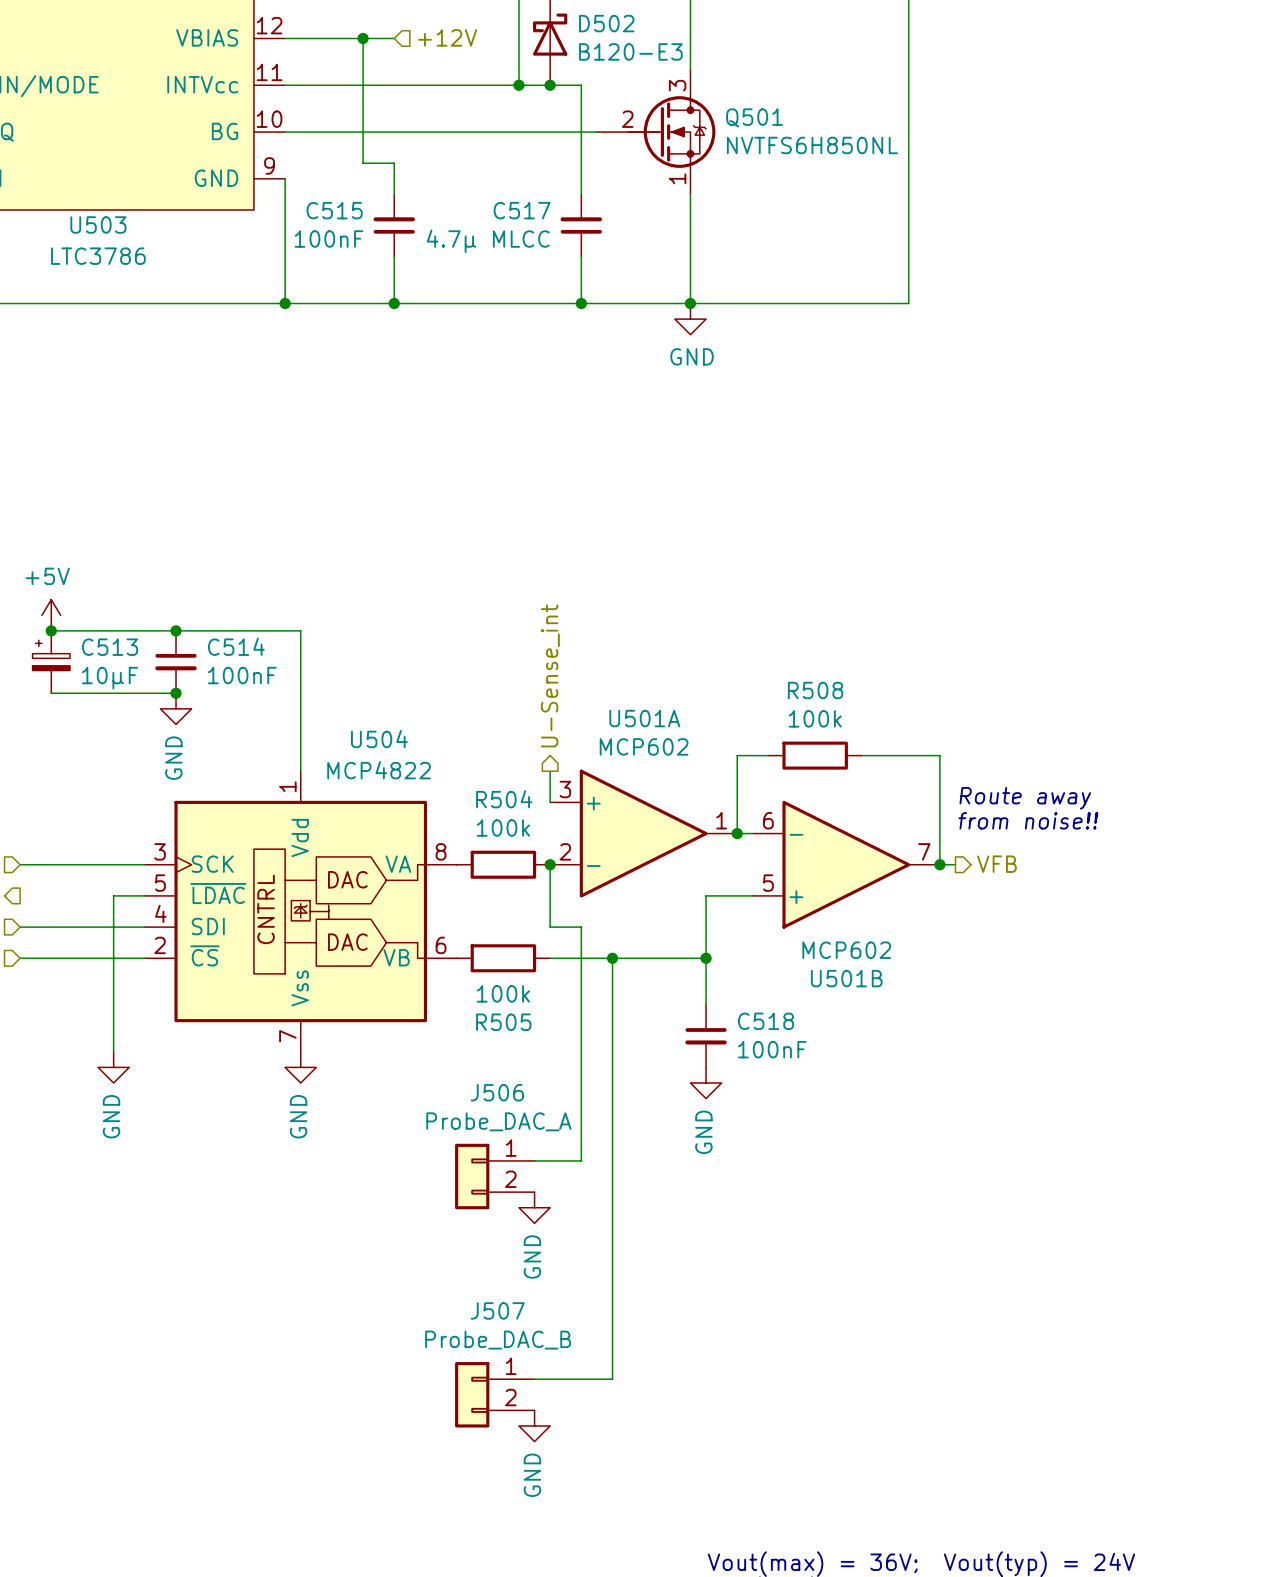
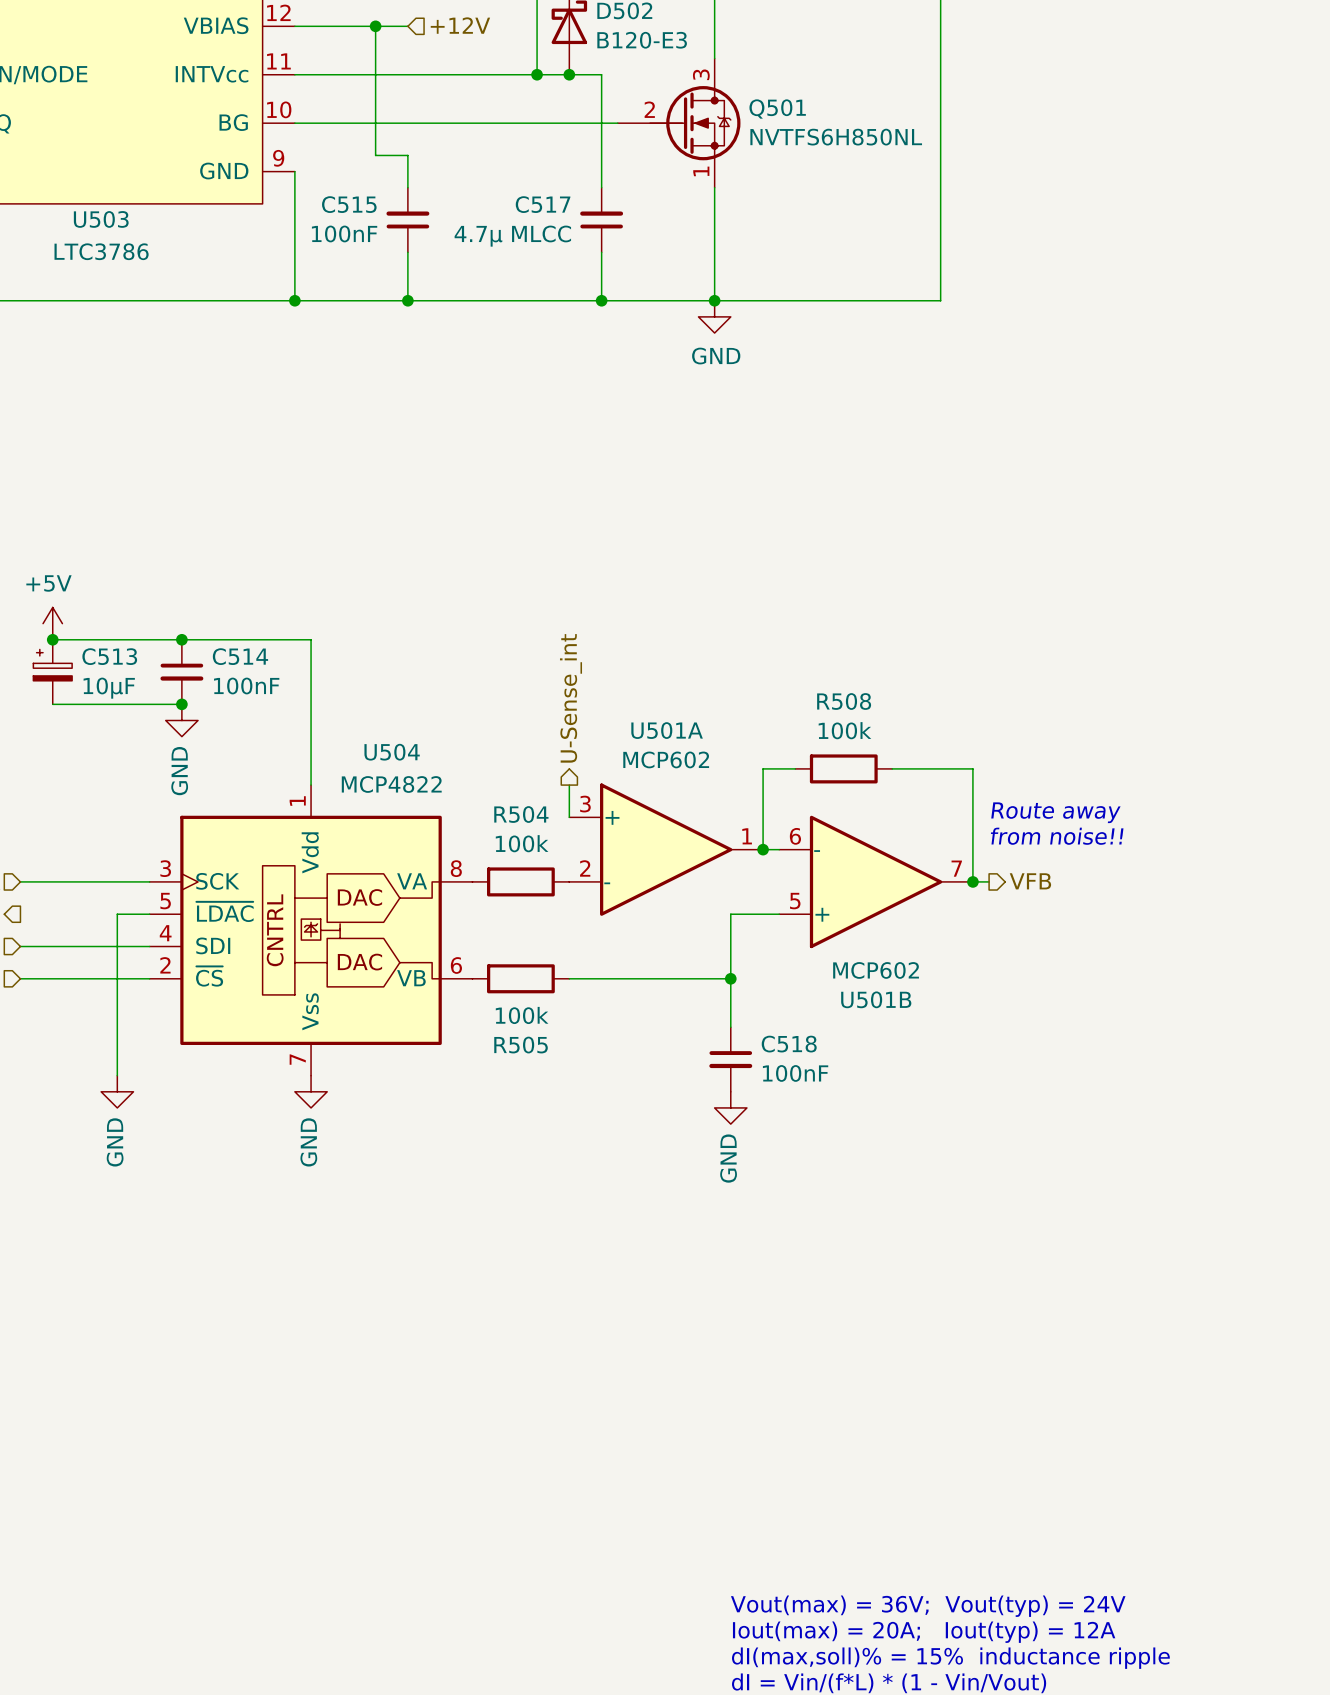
wire: (550, 864) (550, 927) (581, 927) (581, 1160) (534, 1160) -> none
junction: (550, 864) -> none
wire: (612, 958) (612, 1379) (534, 1379) -> none
junction: (612, 958) -> none
J506: Probe_DAC_A (494, 1176) -> none
power symbol: GND (534, 1207) -> none
J507: Probe_DAC_B (494, 1394) -> none
power symbol: GND (534, 1425) -> none

